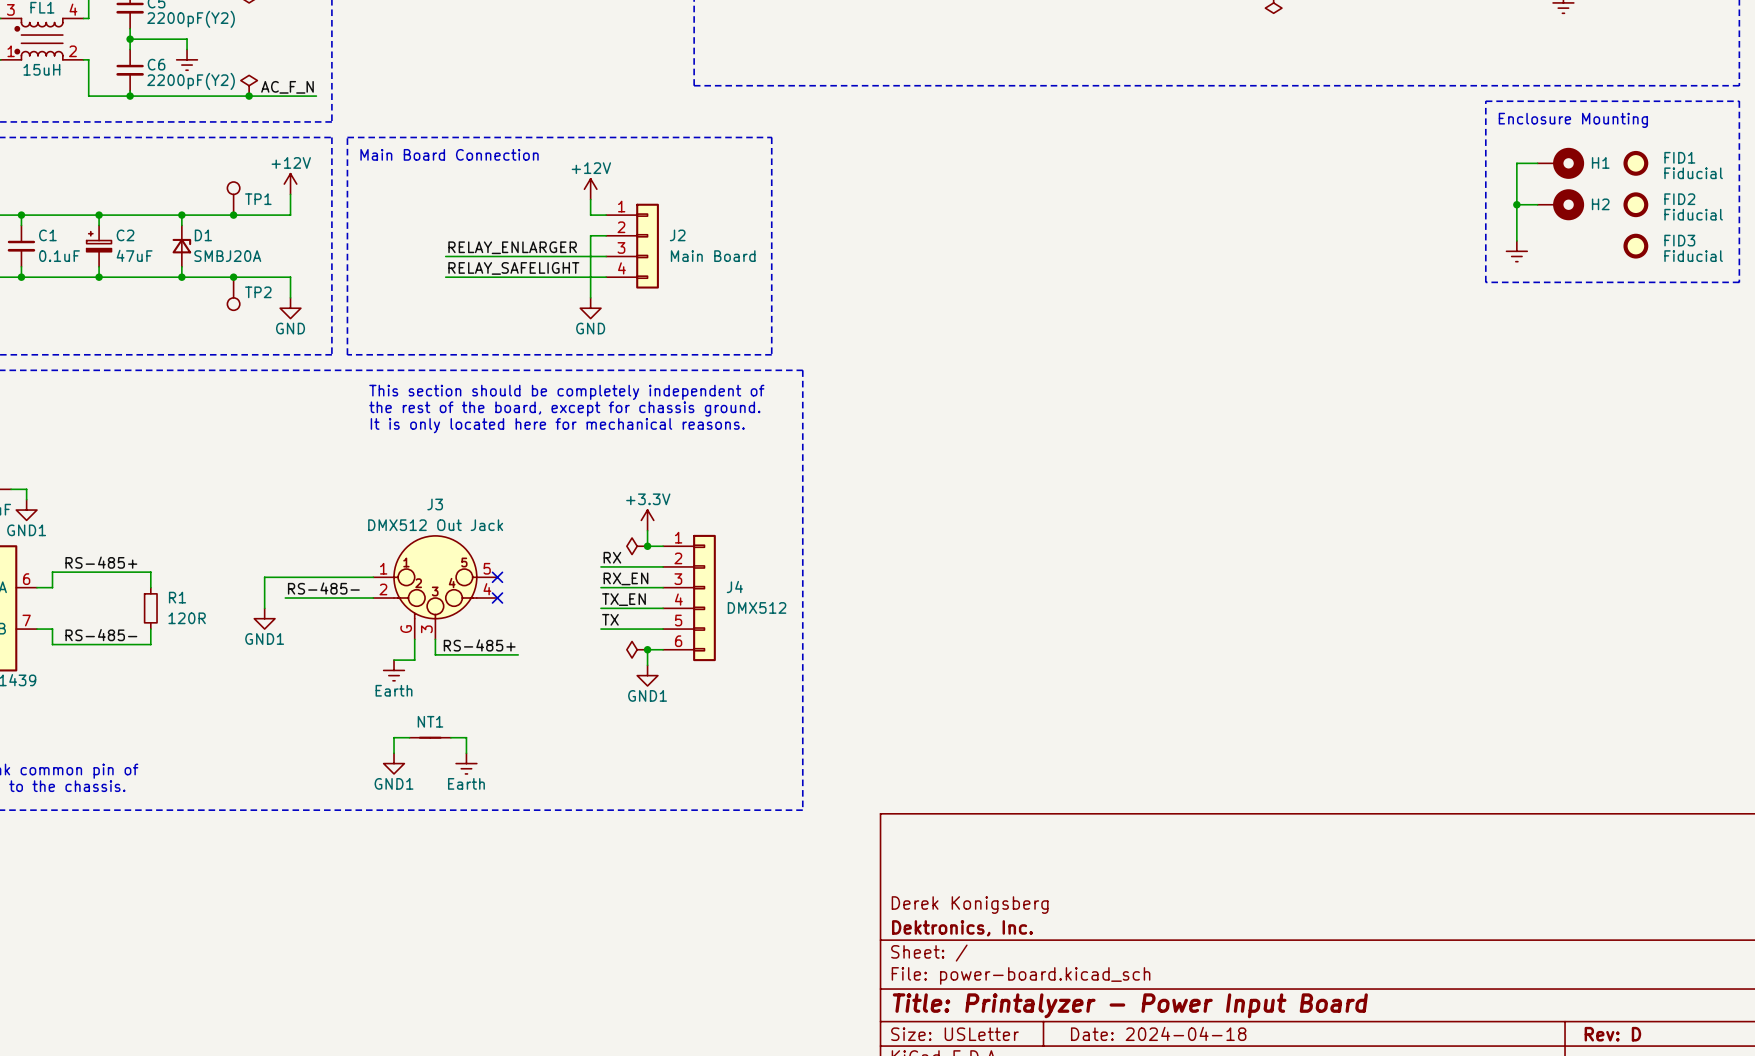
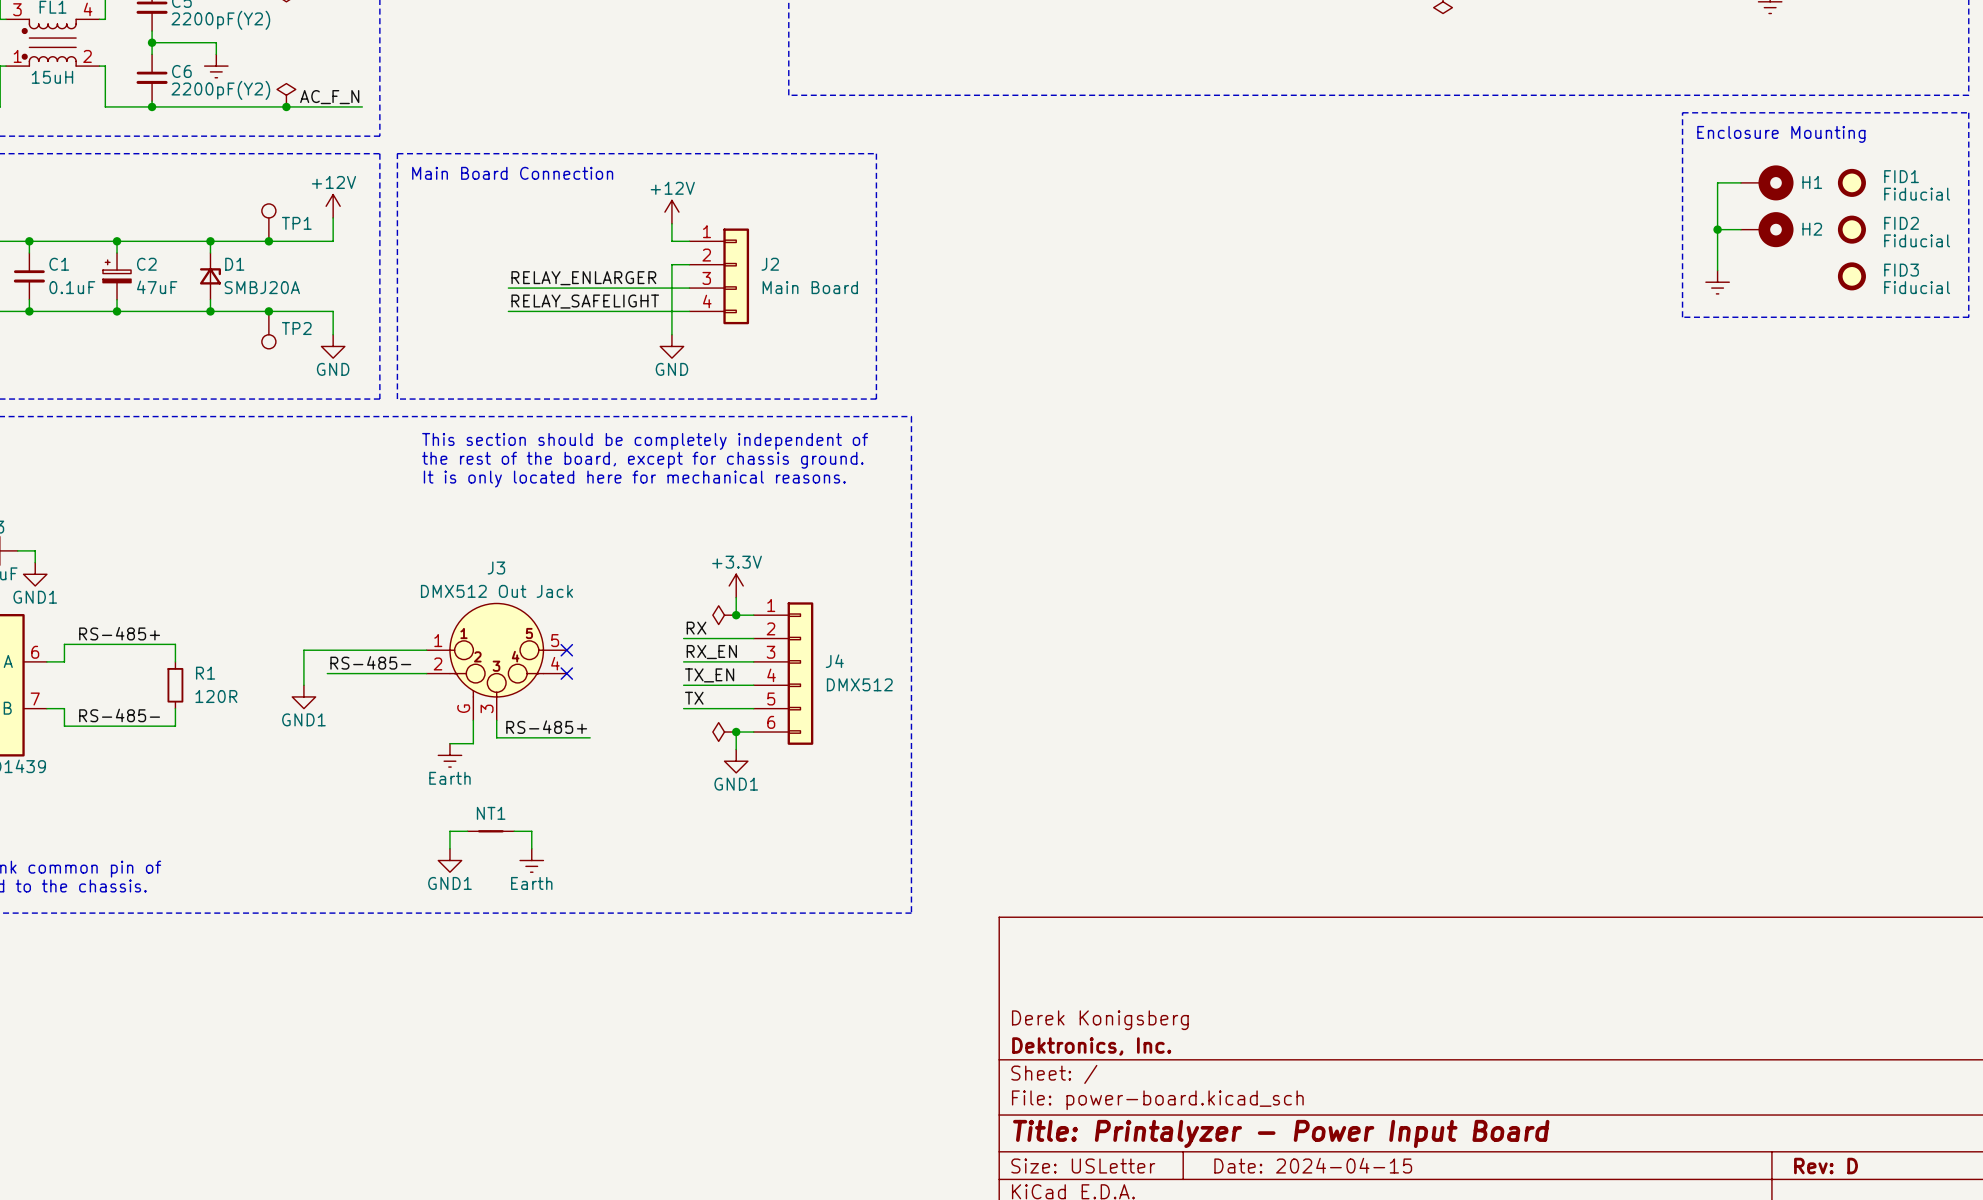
title block: Date: 2024-04-18 (1158, 1033) -> Date: 2024-04-15 (1313, 1165)

